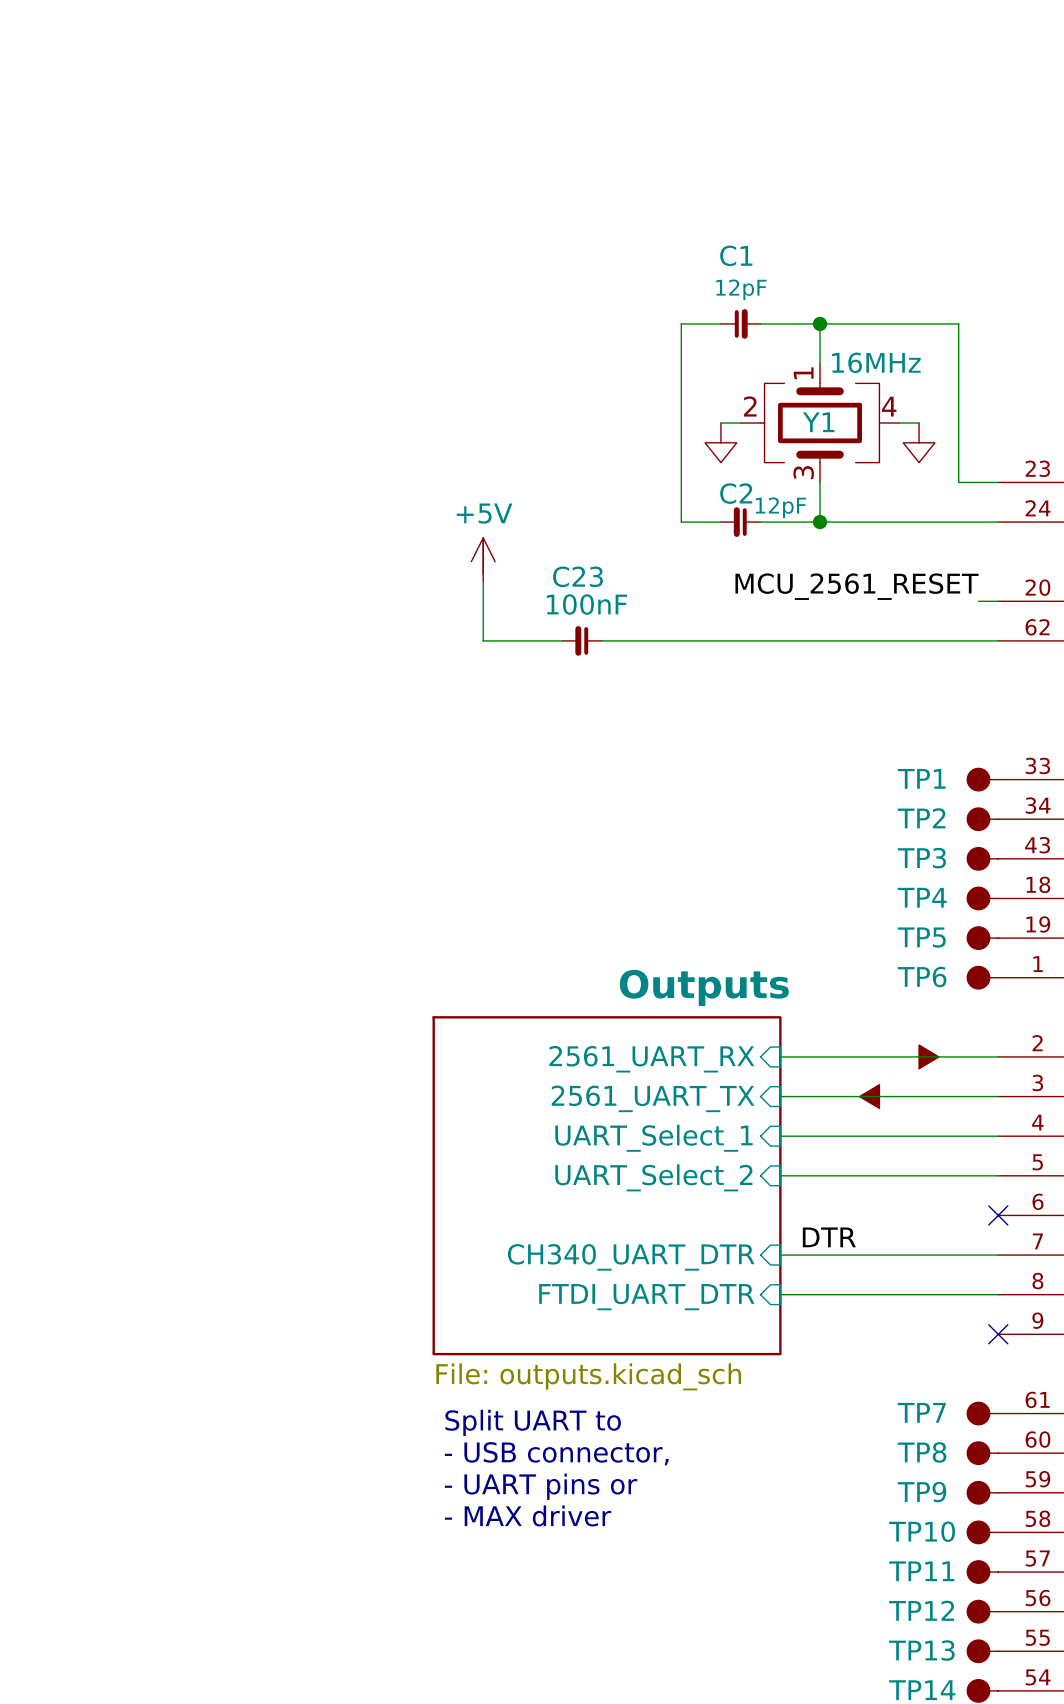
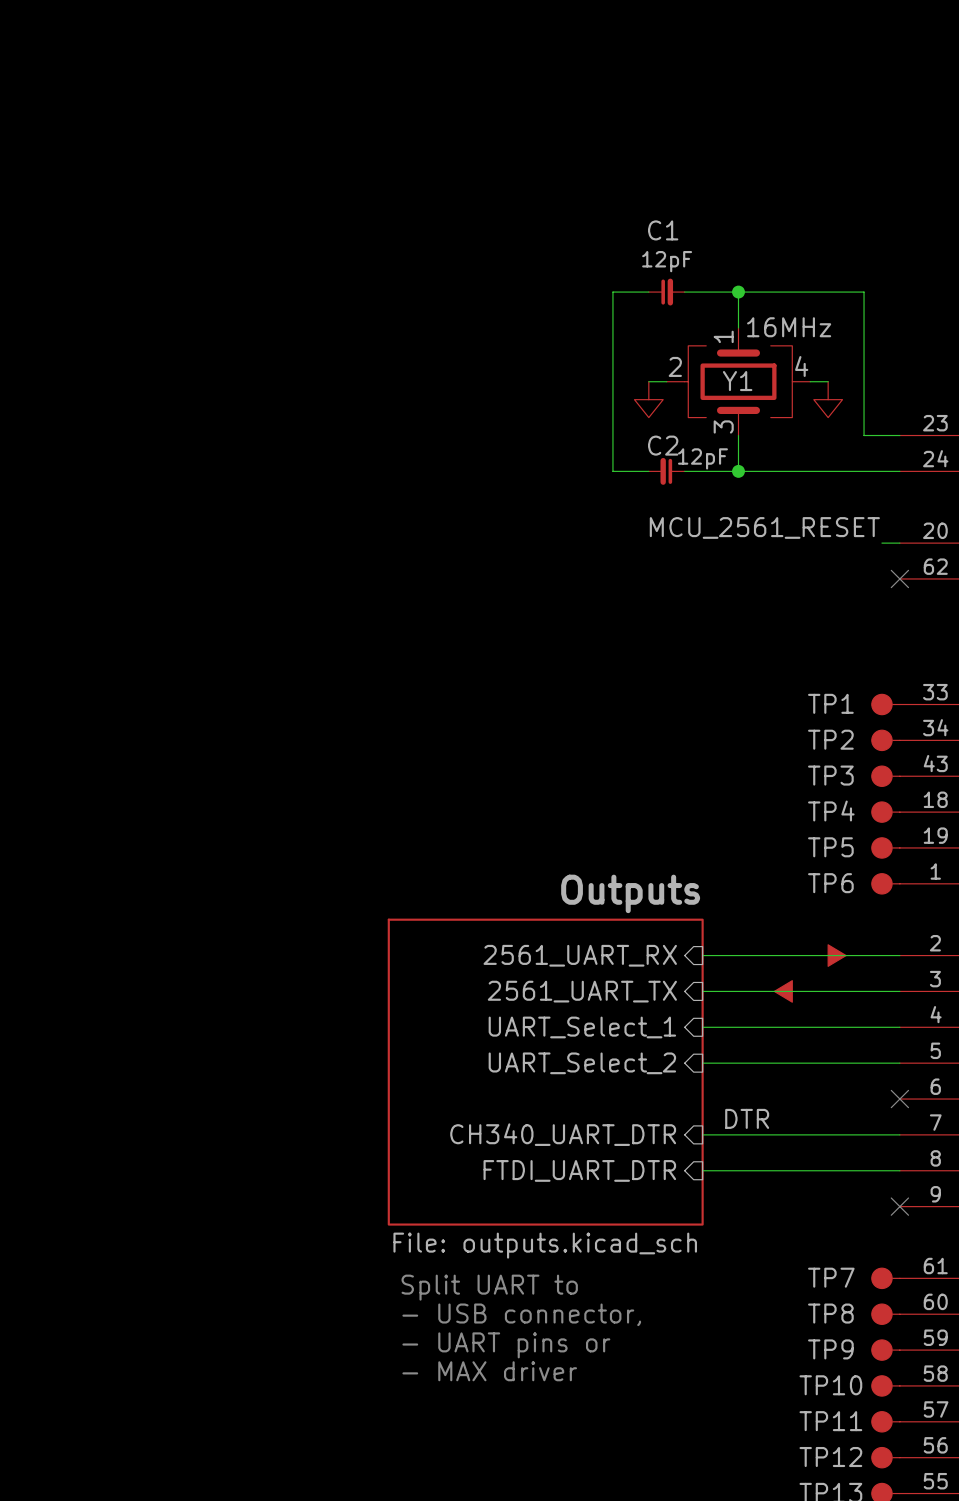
power symbol: +5V (483, 559) -> none
wire: (483, 581) (483, 640) (562, 640) -> none
C23: 100nF (582, 640) -> none
wire: (602, 640) (998, 640) -> none
no-connect mark: none -> (899, 578)

